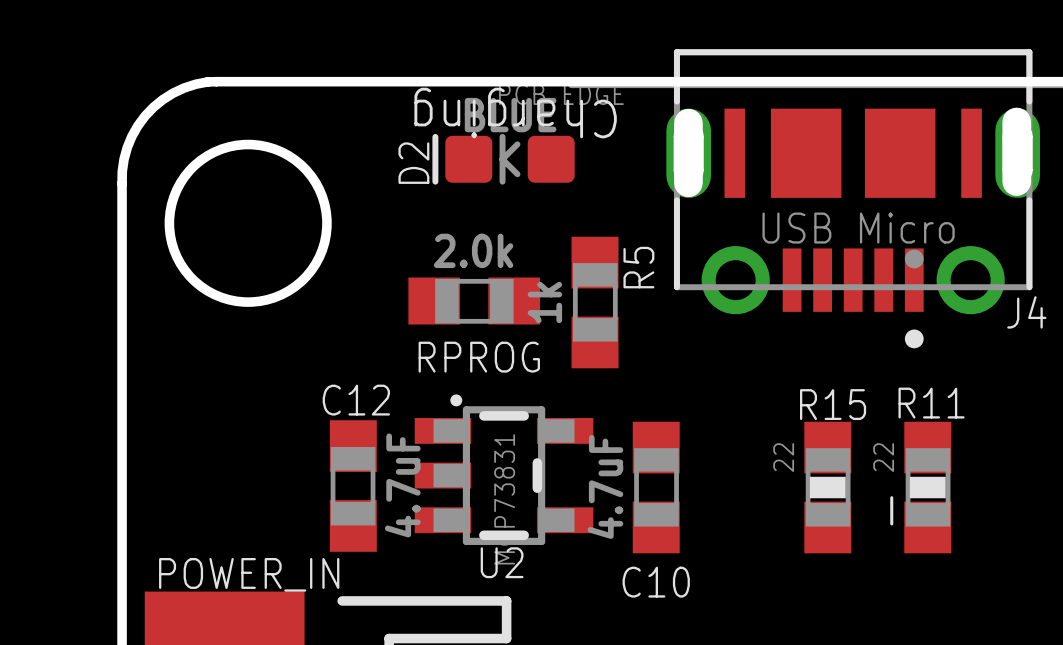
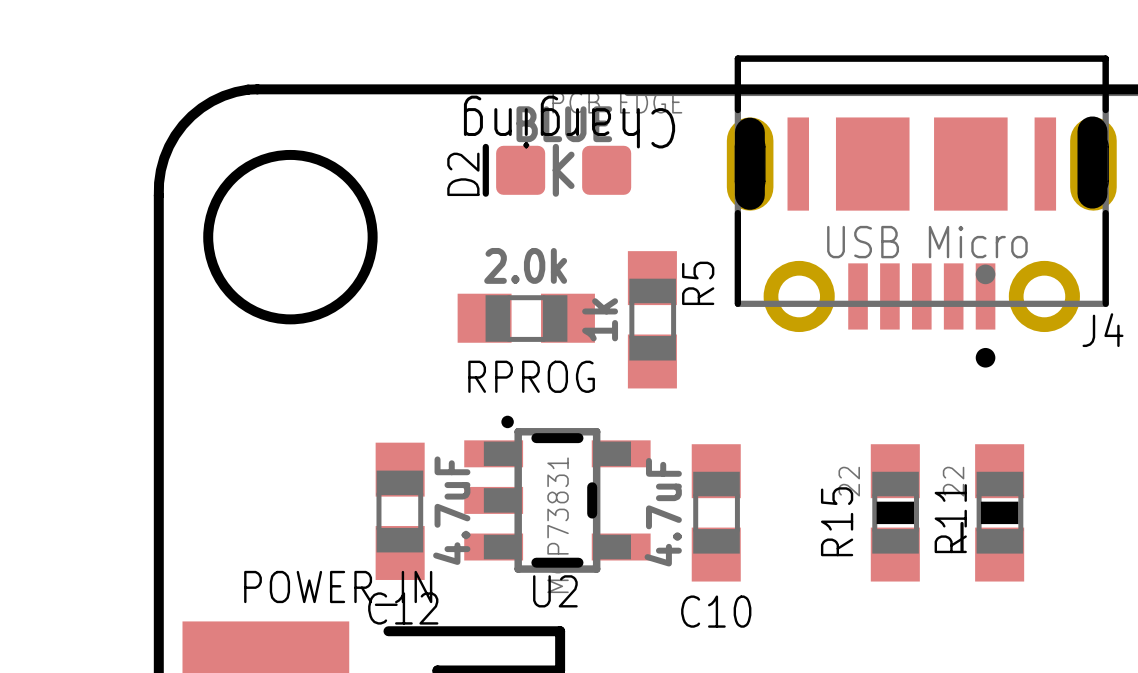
C12 name position: C12 (356, 400) -> C12 (403, 608)
R11 name rotation: 0° (931, 403) -> 90° counterclockwise (950, 518)
R11 name position: R11 (931, 403) -> R11 (950, 518)
R15 name rotation: 0° (833, 404) -> 90° counterclockwise (837, 521)
R15 name position: R15 (833, 404) -> R15 (837, 521)
POWER_IN name position: POWER_IN (249, 574) -> POWER_IN (338, 588)

